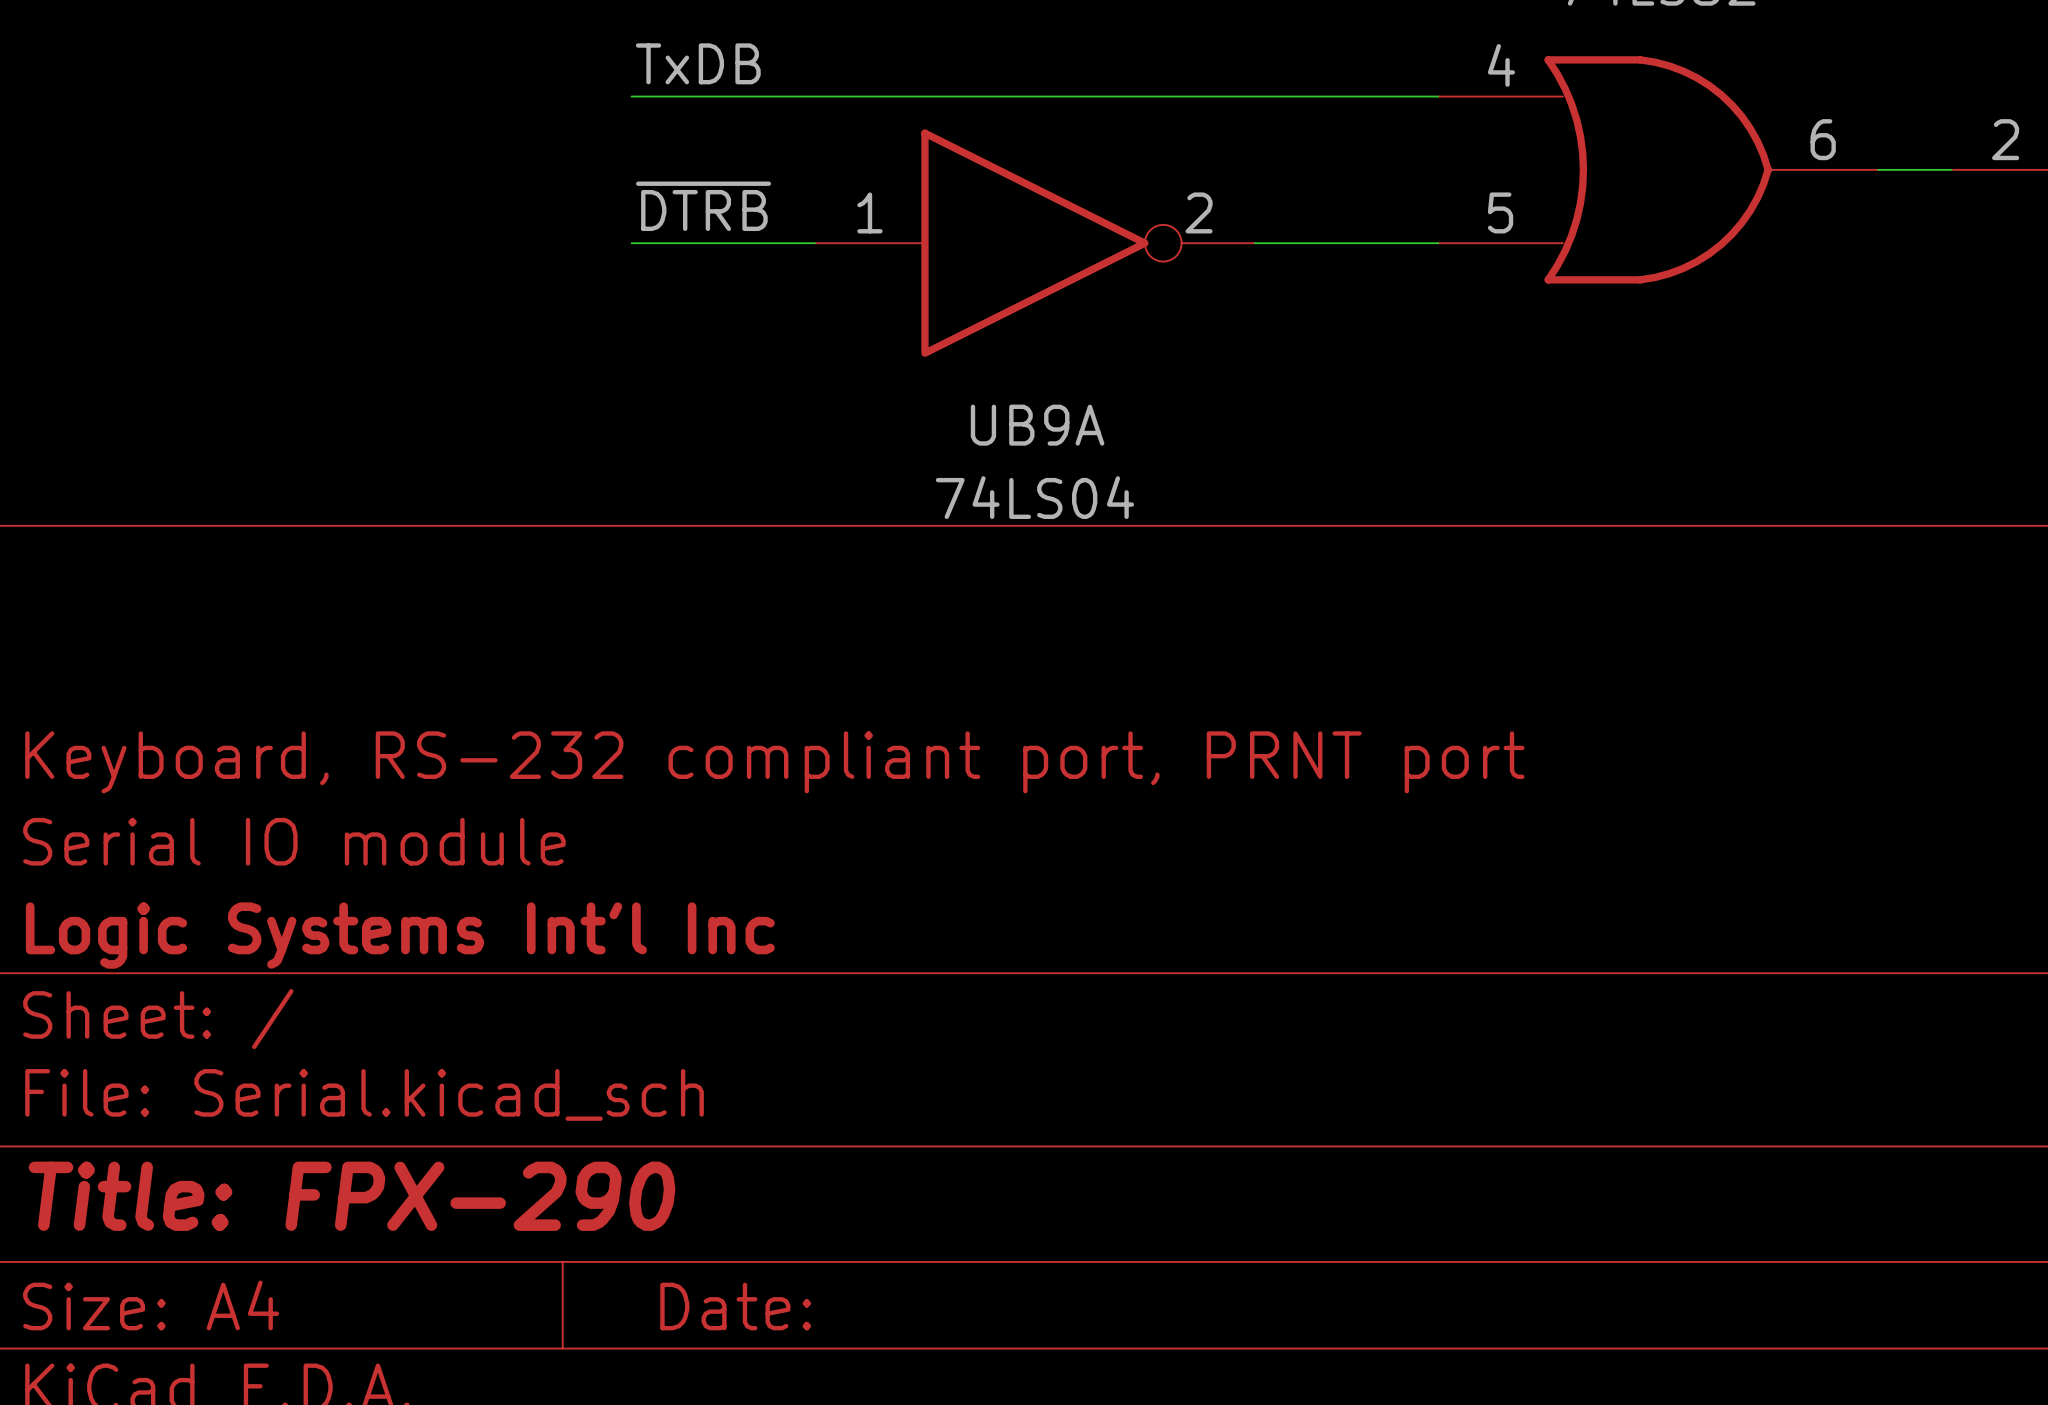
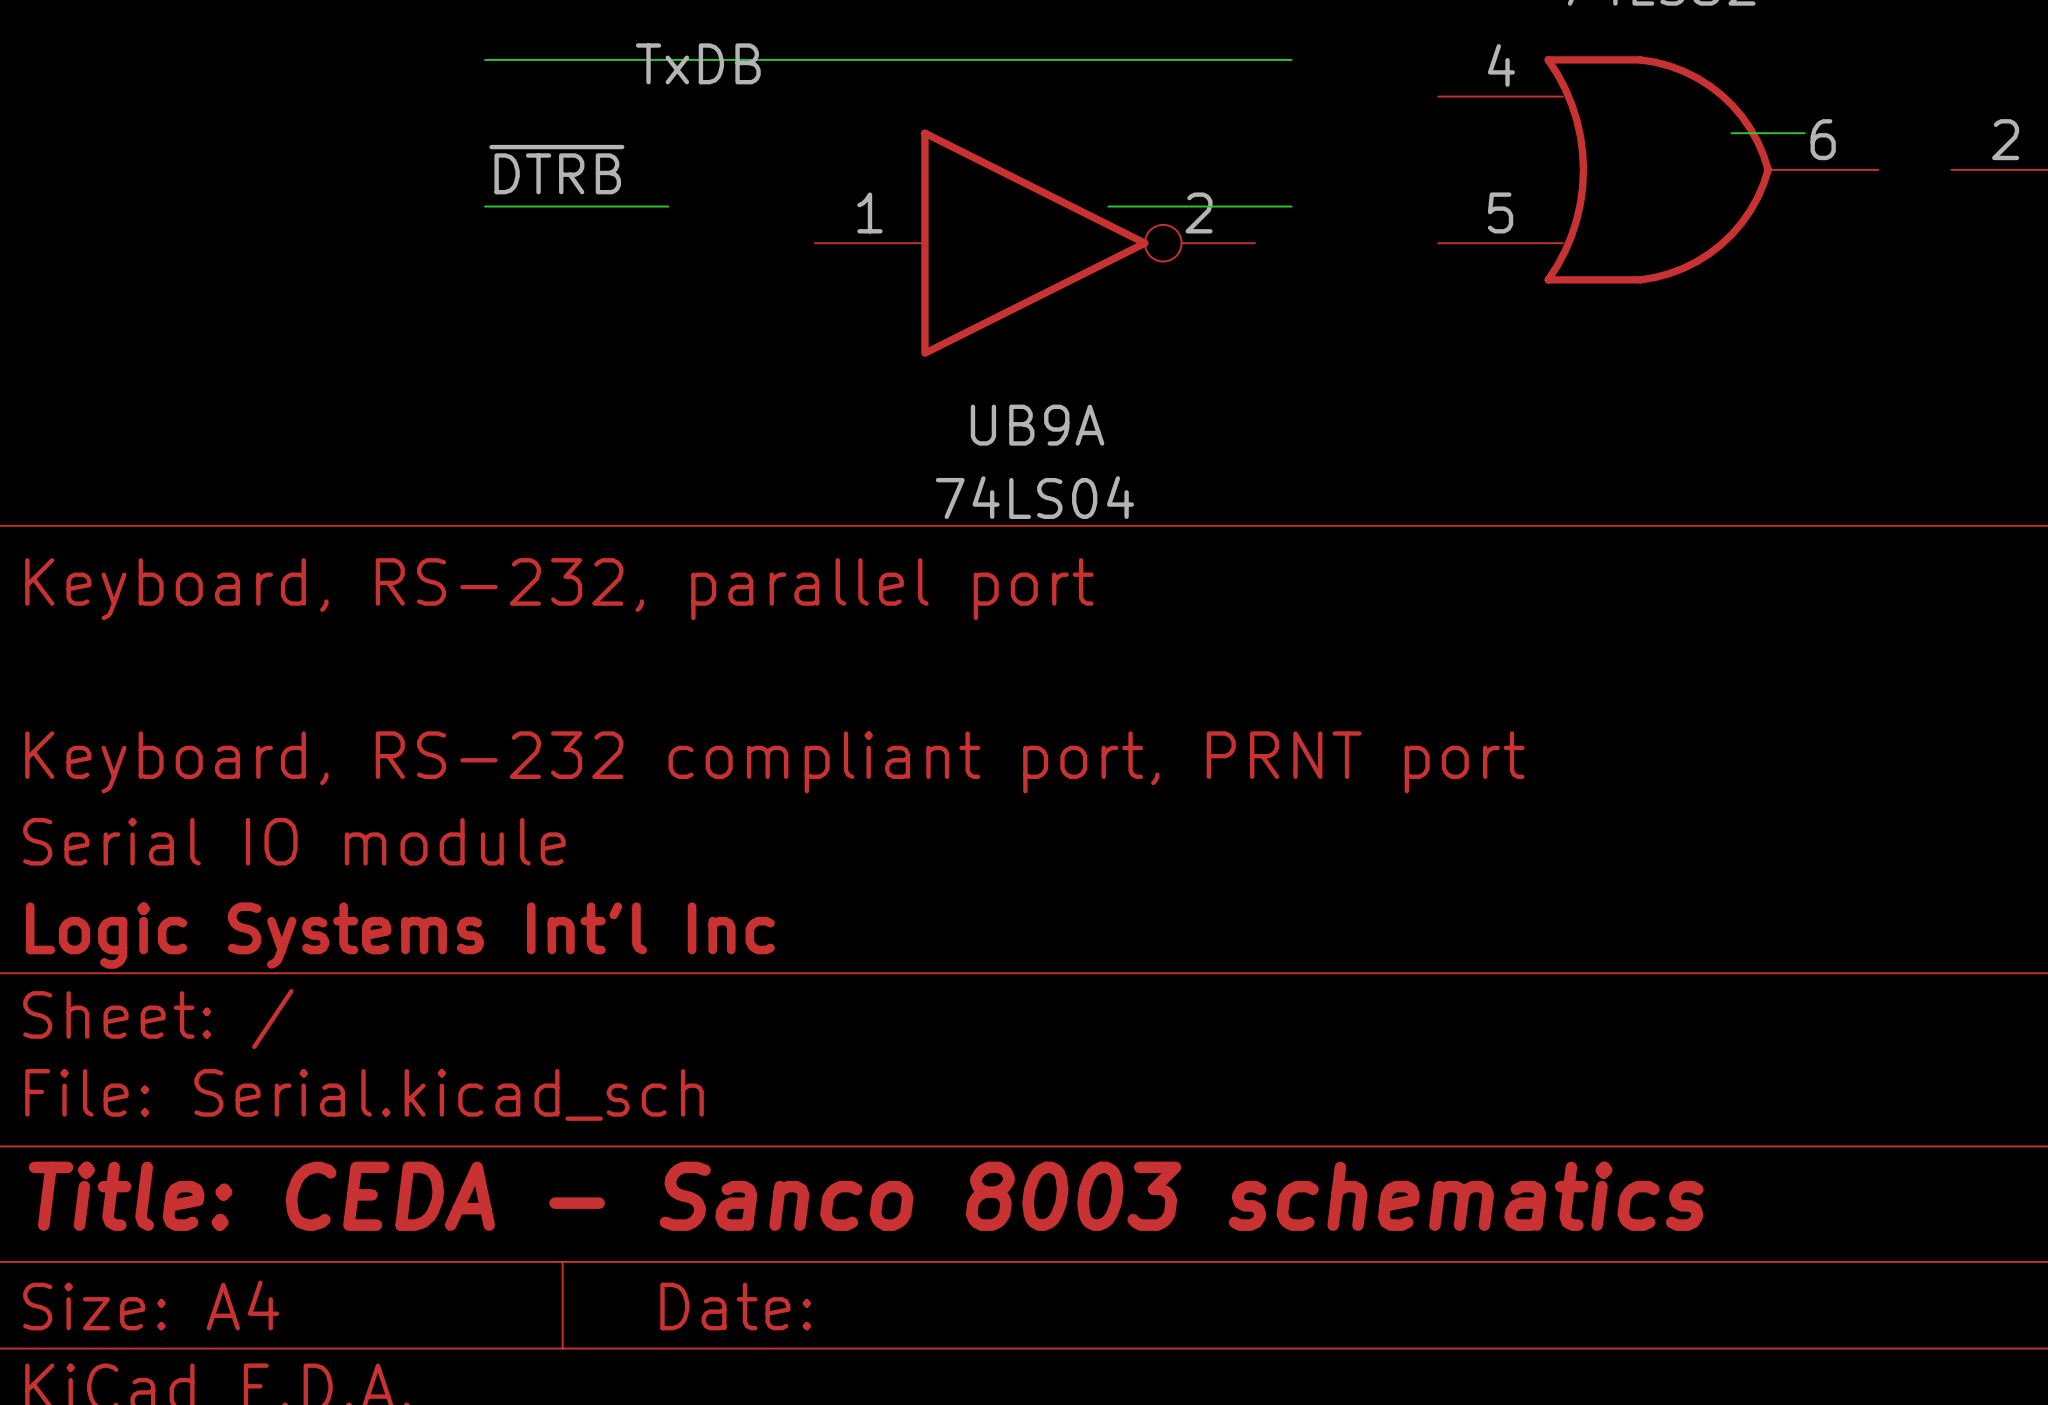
wire: (631, 96) (1438, 96) -> (485, 59) (1291, 59)
wire: (1878, 169) (1951, 169) -> (1731, 133) (1804, 133)
label position: ~{DTRB} (703, 206) -> ~{DTRB} (556, 169)
wire: (631, 243) (814, 243) -> (485, 206) (668, 206)
wire: (1254, 243) (1438, 243) -> (1108, 206) (1291, 206)
title block: none -> Keyboard, RS-232, parallel port (559, 589)
title block: Title: FPX-290 (352, 1196) -> Title: CEDA - Sanco 8003 schematics (866, 1196)

